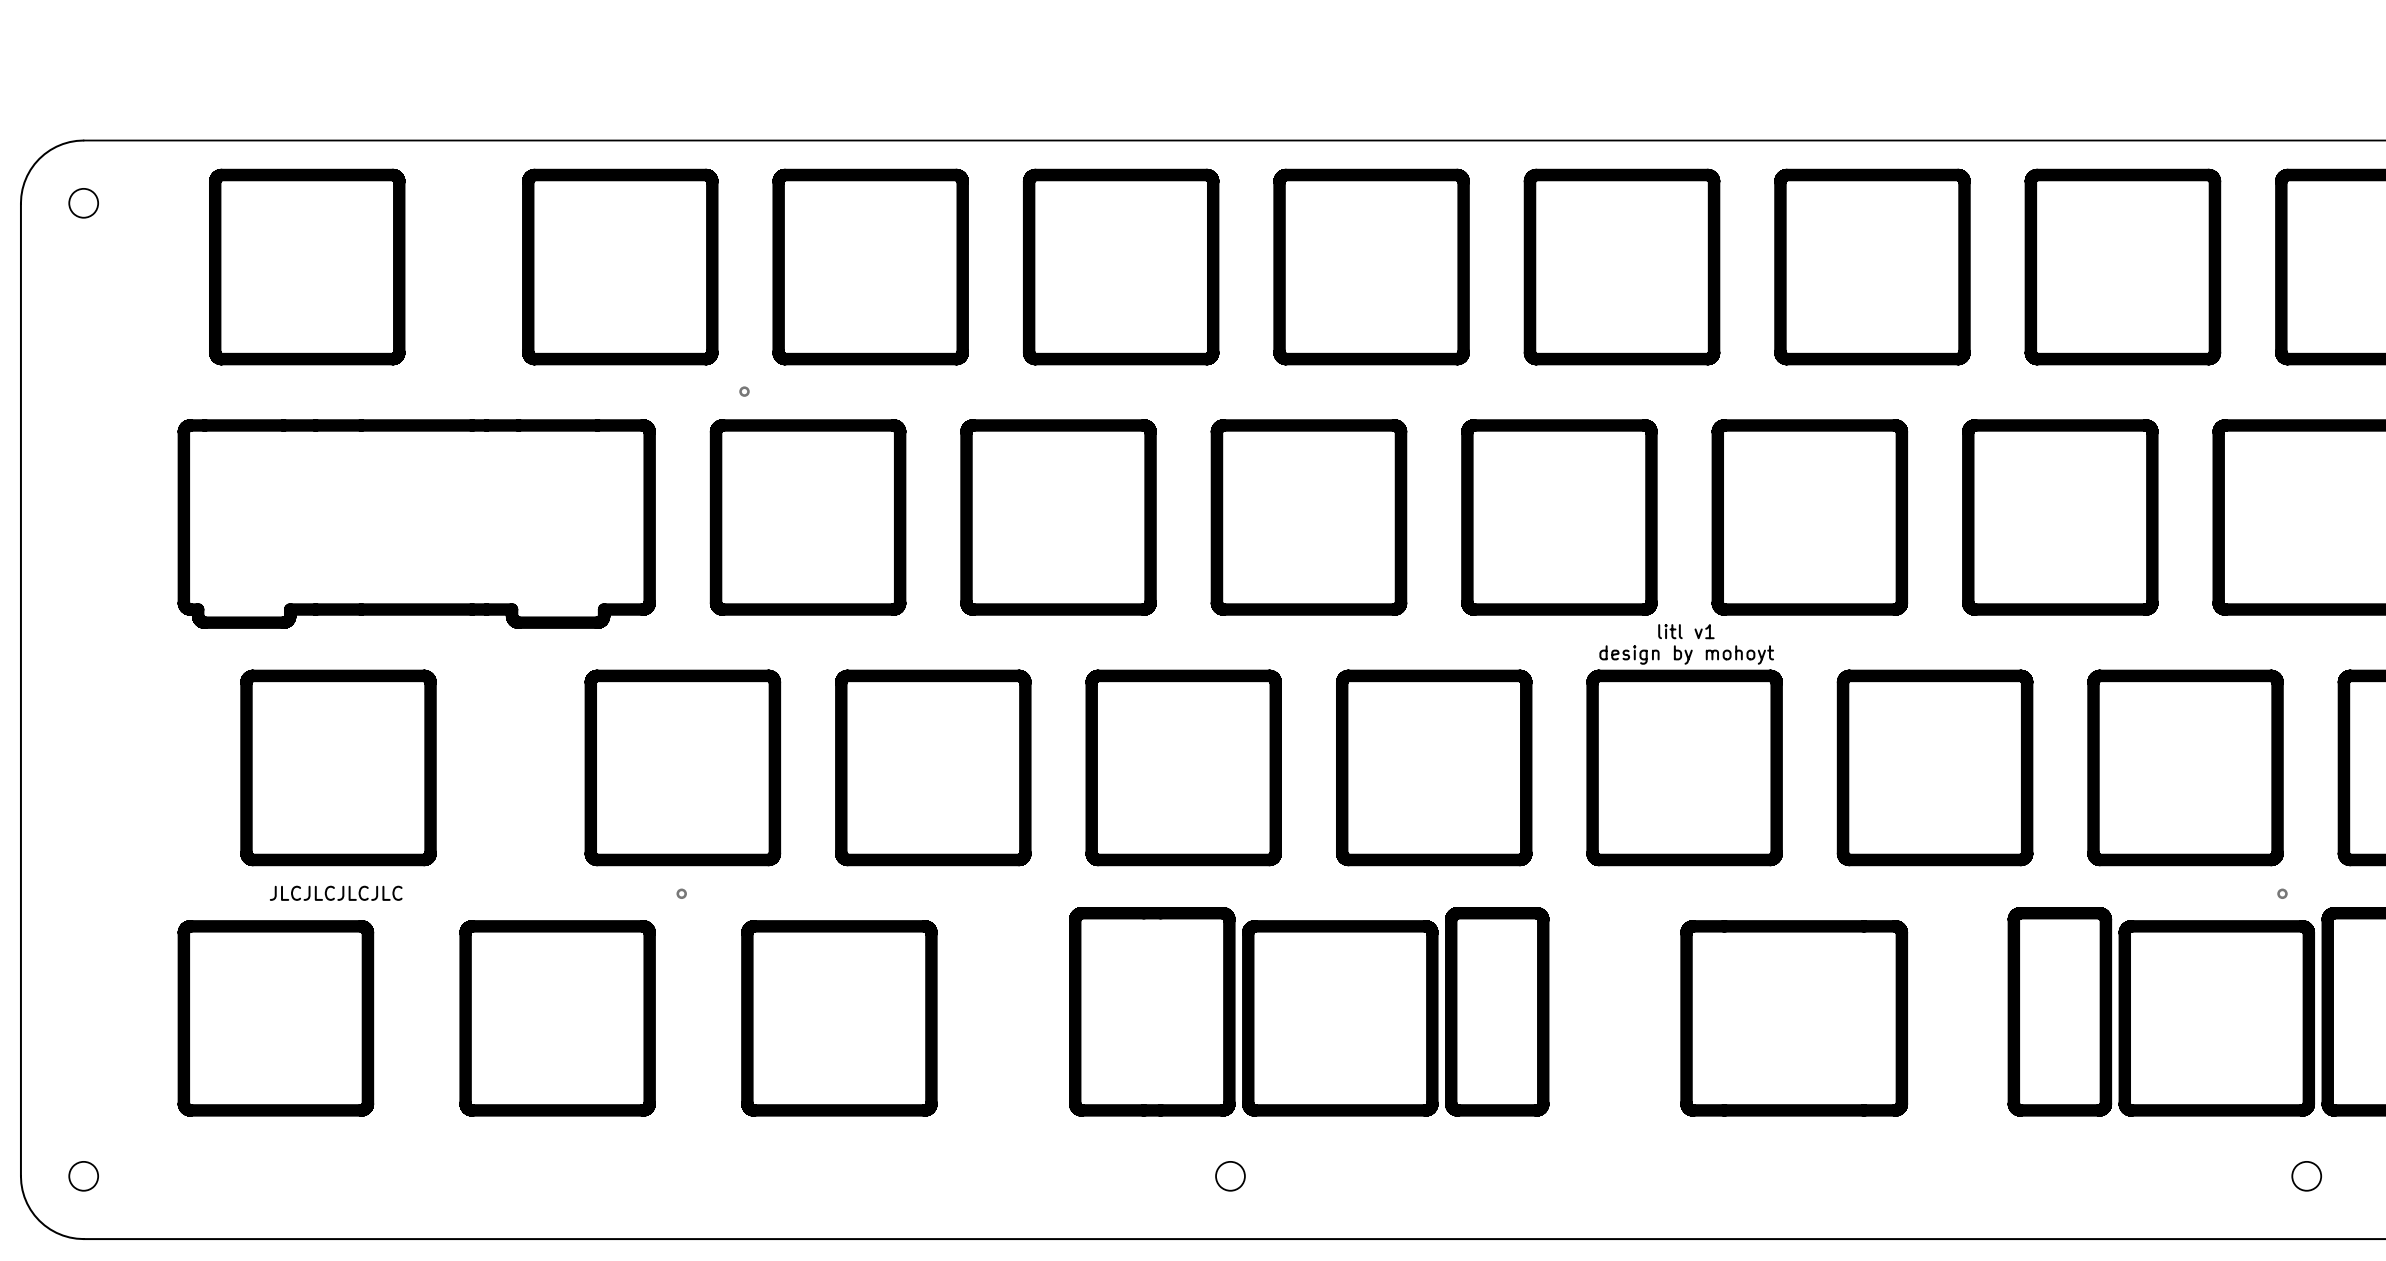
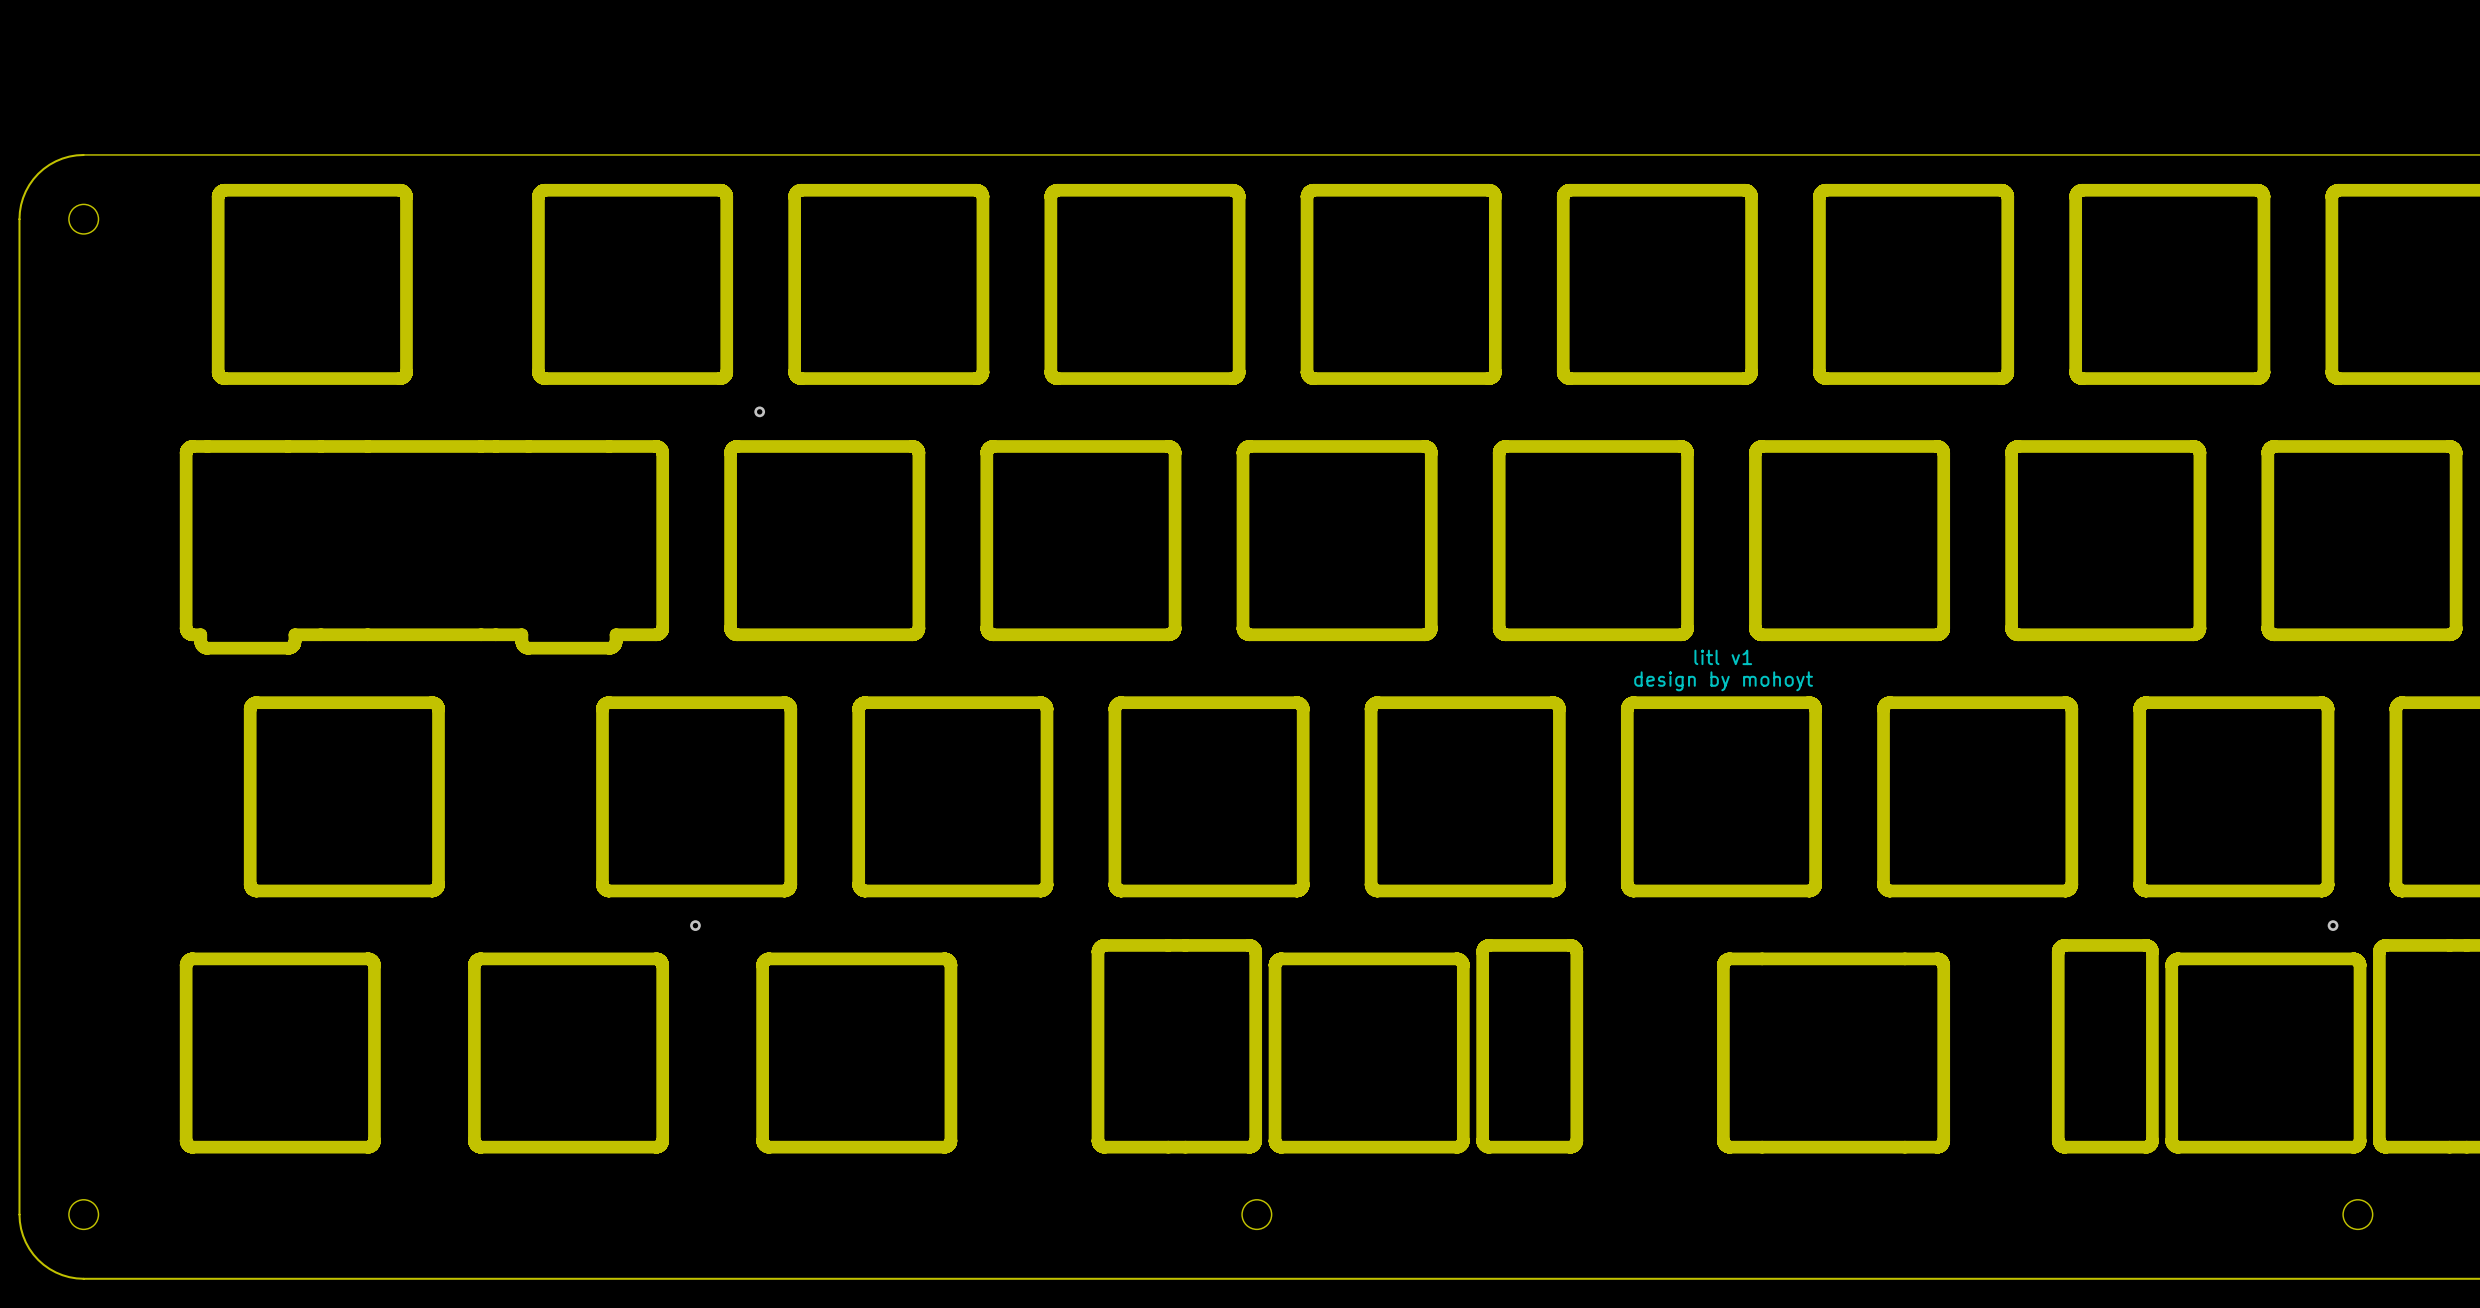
text: JLCJLCJLCJLC (336, 893) -> none

